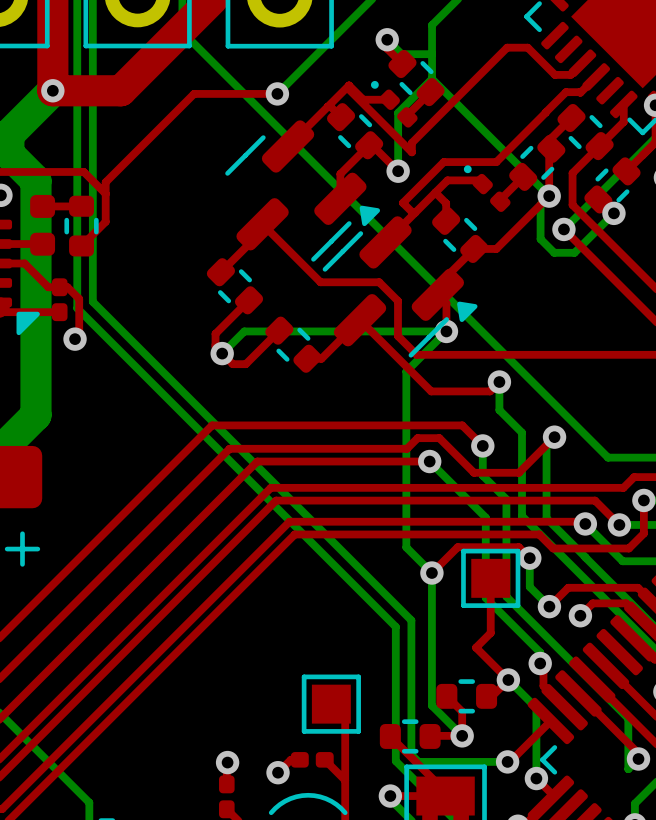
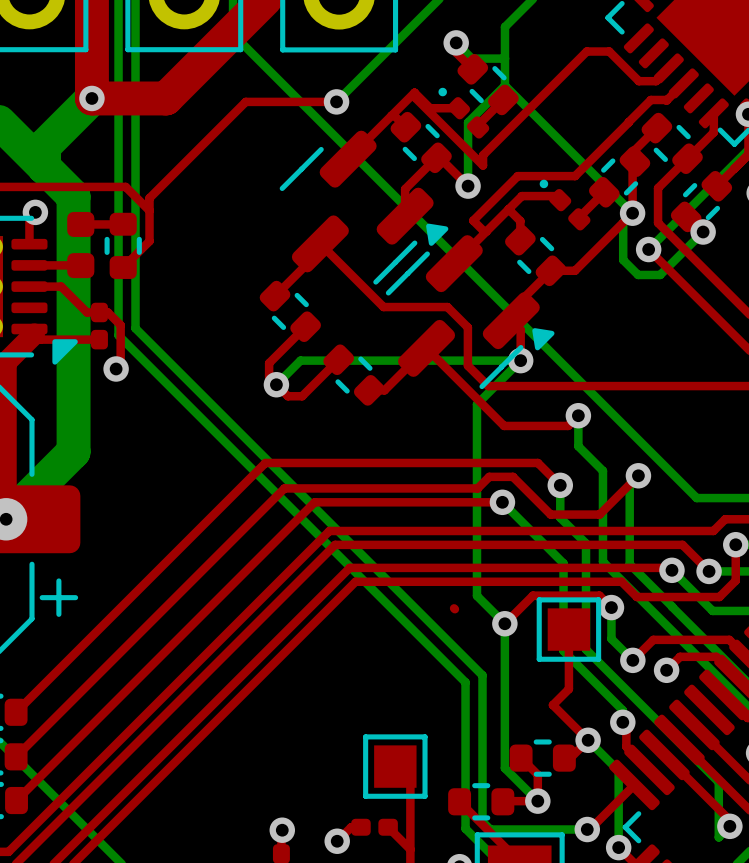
top track: none -> (454, 608) (454, 609)

